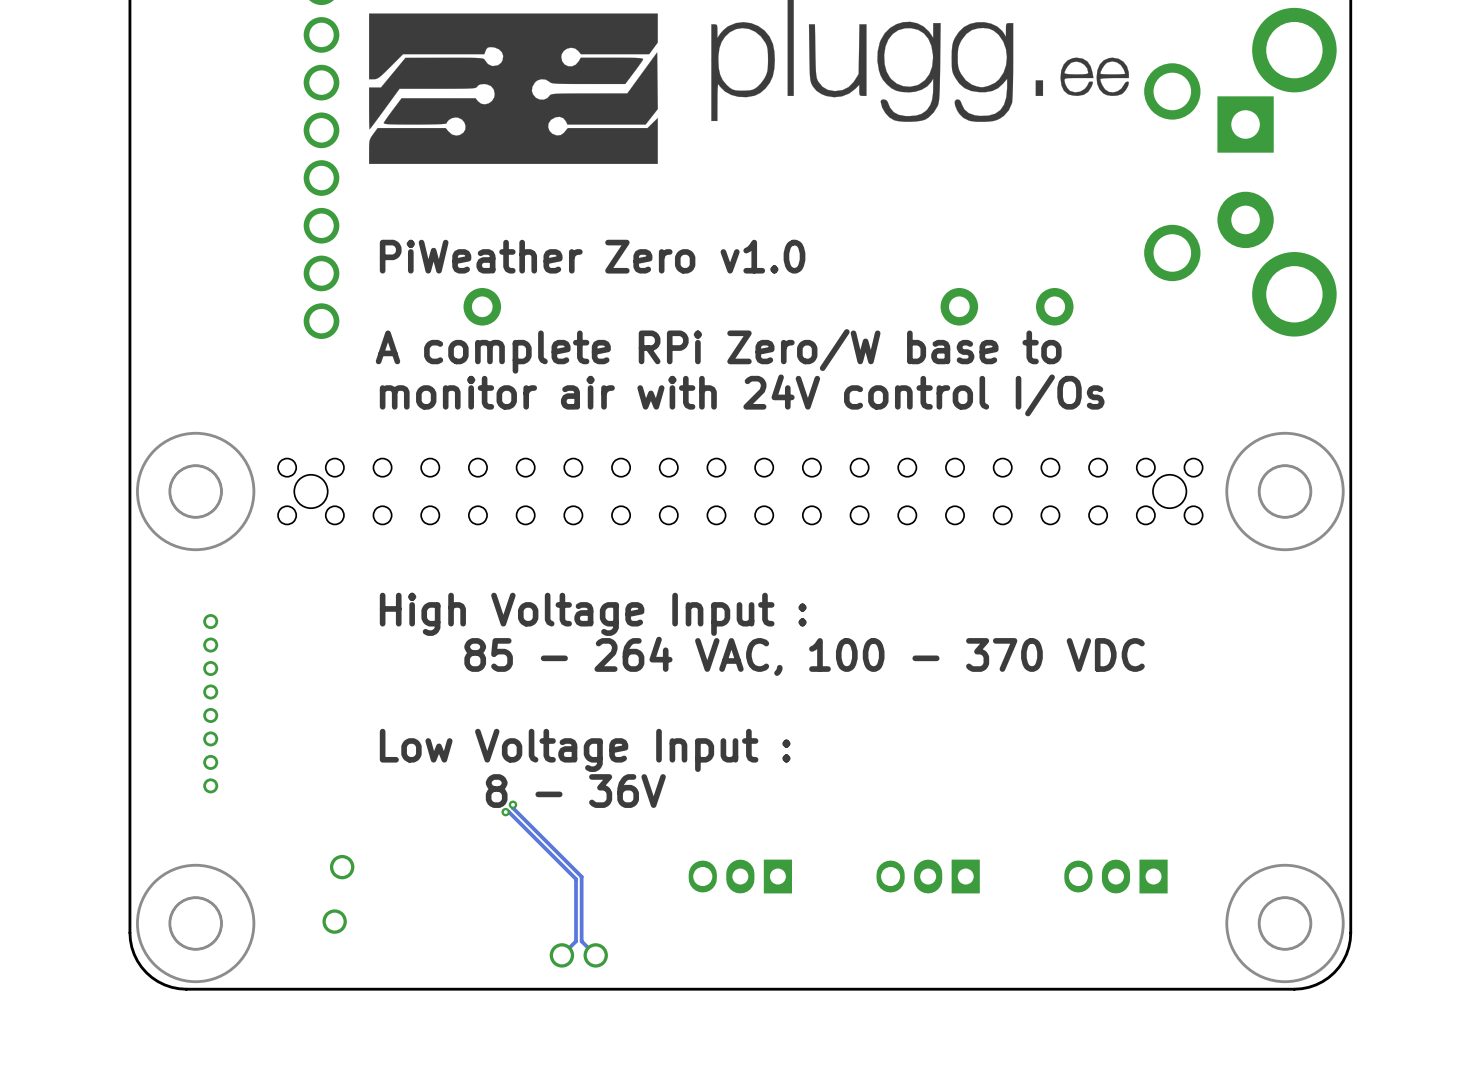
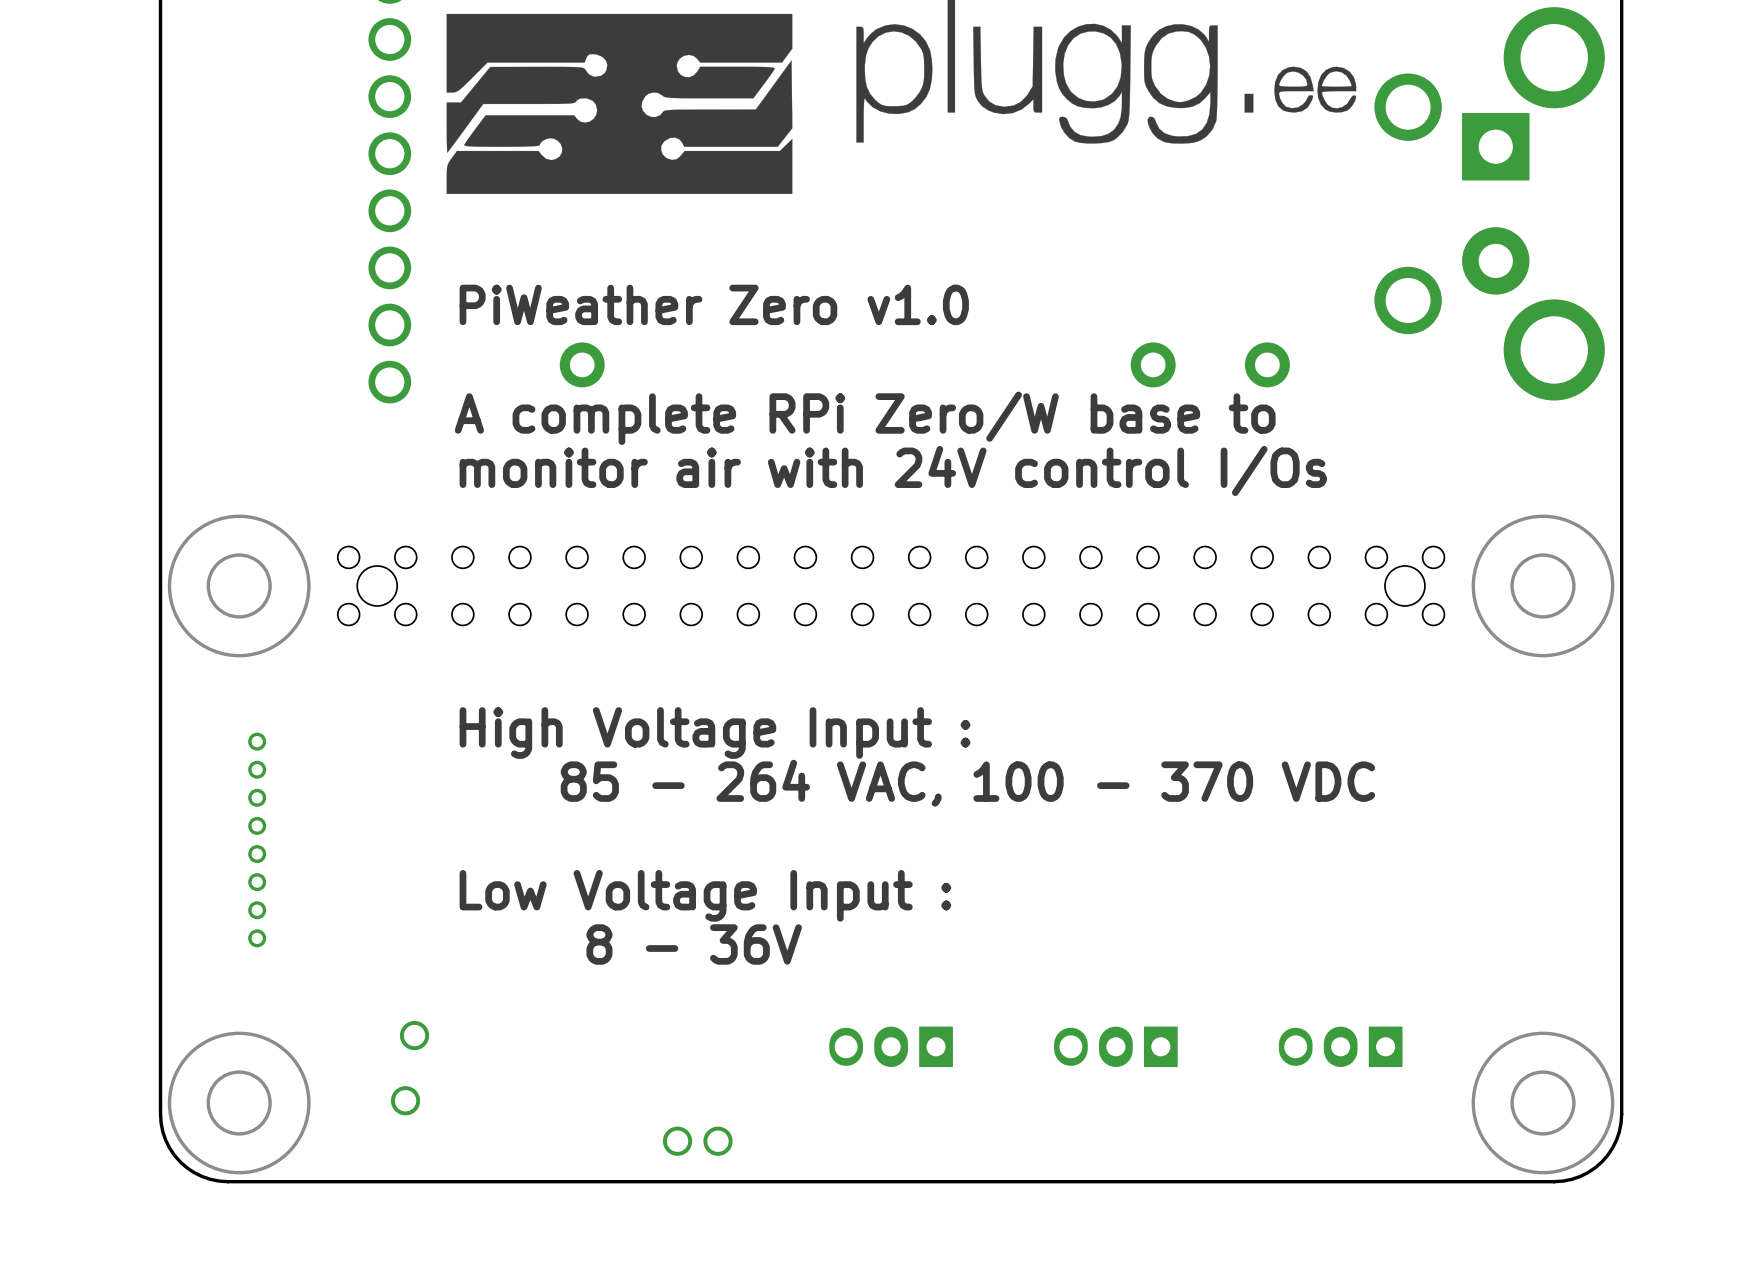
track: (512, 804) (512, 808) (581, 876) (581, 941) (595, 955) -> none
via: (512, 804) -> none
track: (505, 812) (508, 812) (576, 879) (576, 941) (561, 955) -> none
via: (505, 812) -> none

